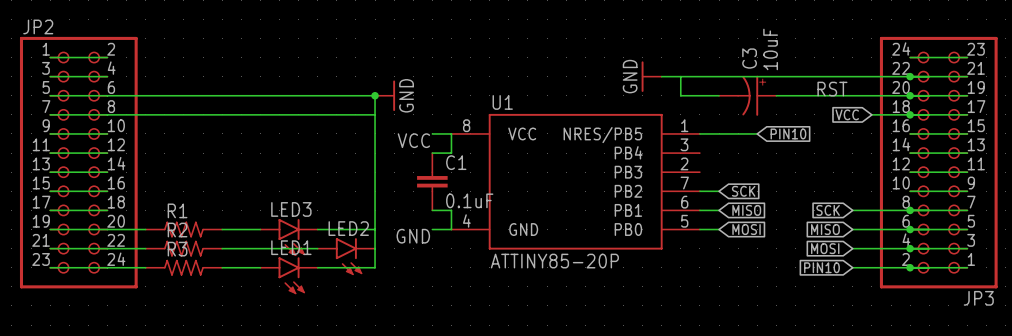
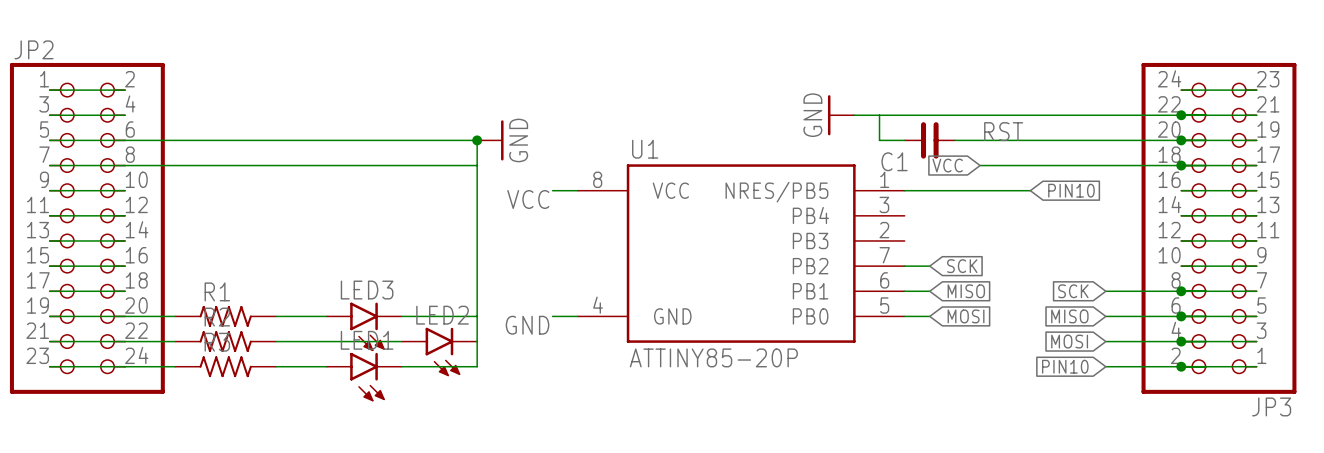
label position: RST (832, 89) -> RST (1003, 131)
C3: 10uF (747, 95) -> none
wire: none -> (980, 165) (1130, 165)
global label position: VCC (847, 114) -> VCC (947, 165)
wire: (451, 133) (451, 153) (432, 153) -> none
wire: none -> (980, 190) (1030, 190)
global label position: PIN10 (788, 133) -> PIN10 (1071, 190)
C1 symbol: [417, 153, 448, 211] -> [903, 122, 956, 159]
C1 name position: C1 (456, 162) -> C1 (894, 161)
C1 value: 0.1uF (469, 200) -> none
wire: (432, 210) (451, 210) (451, 229) -> none

